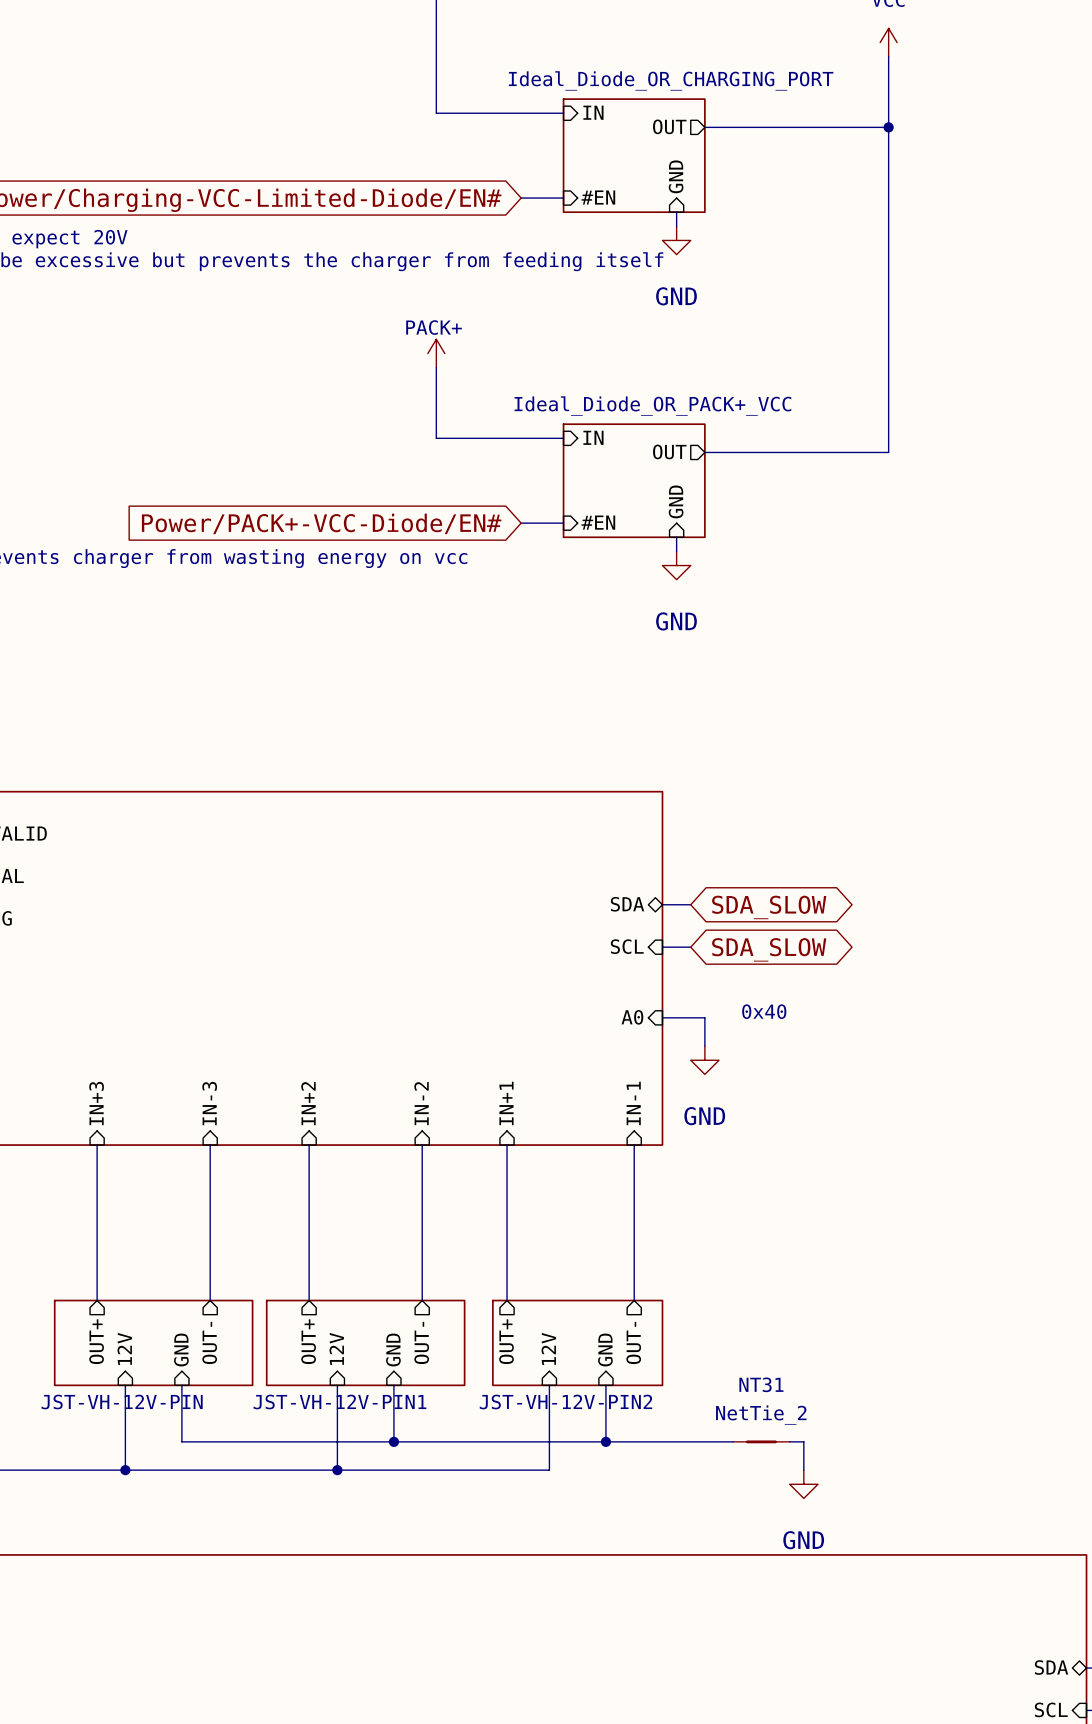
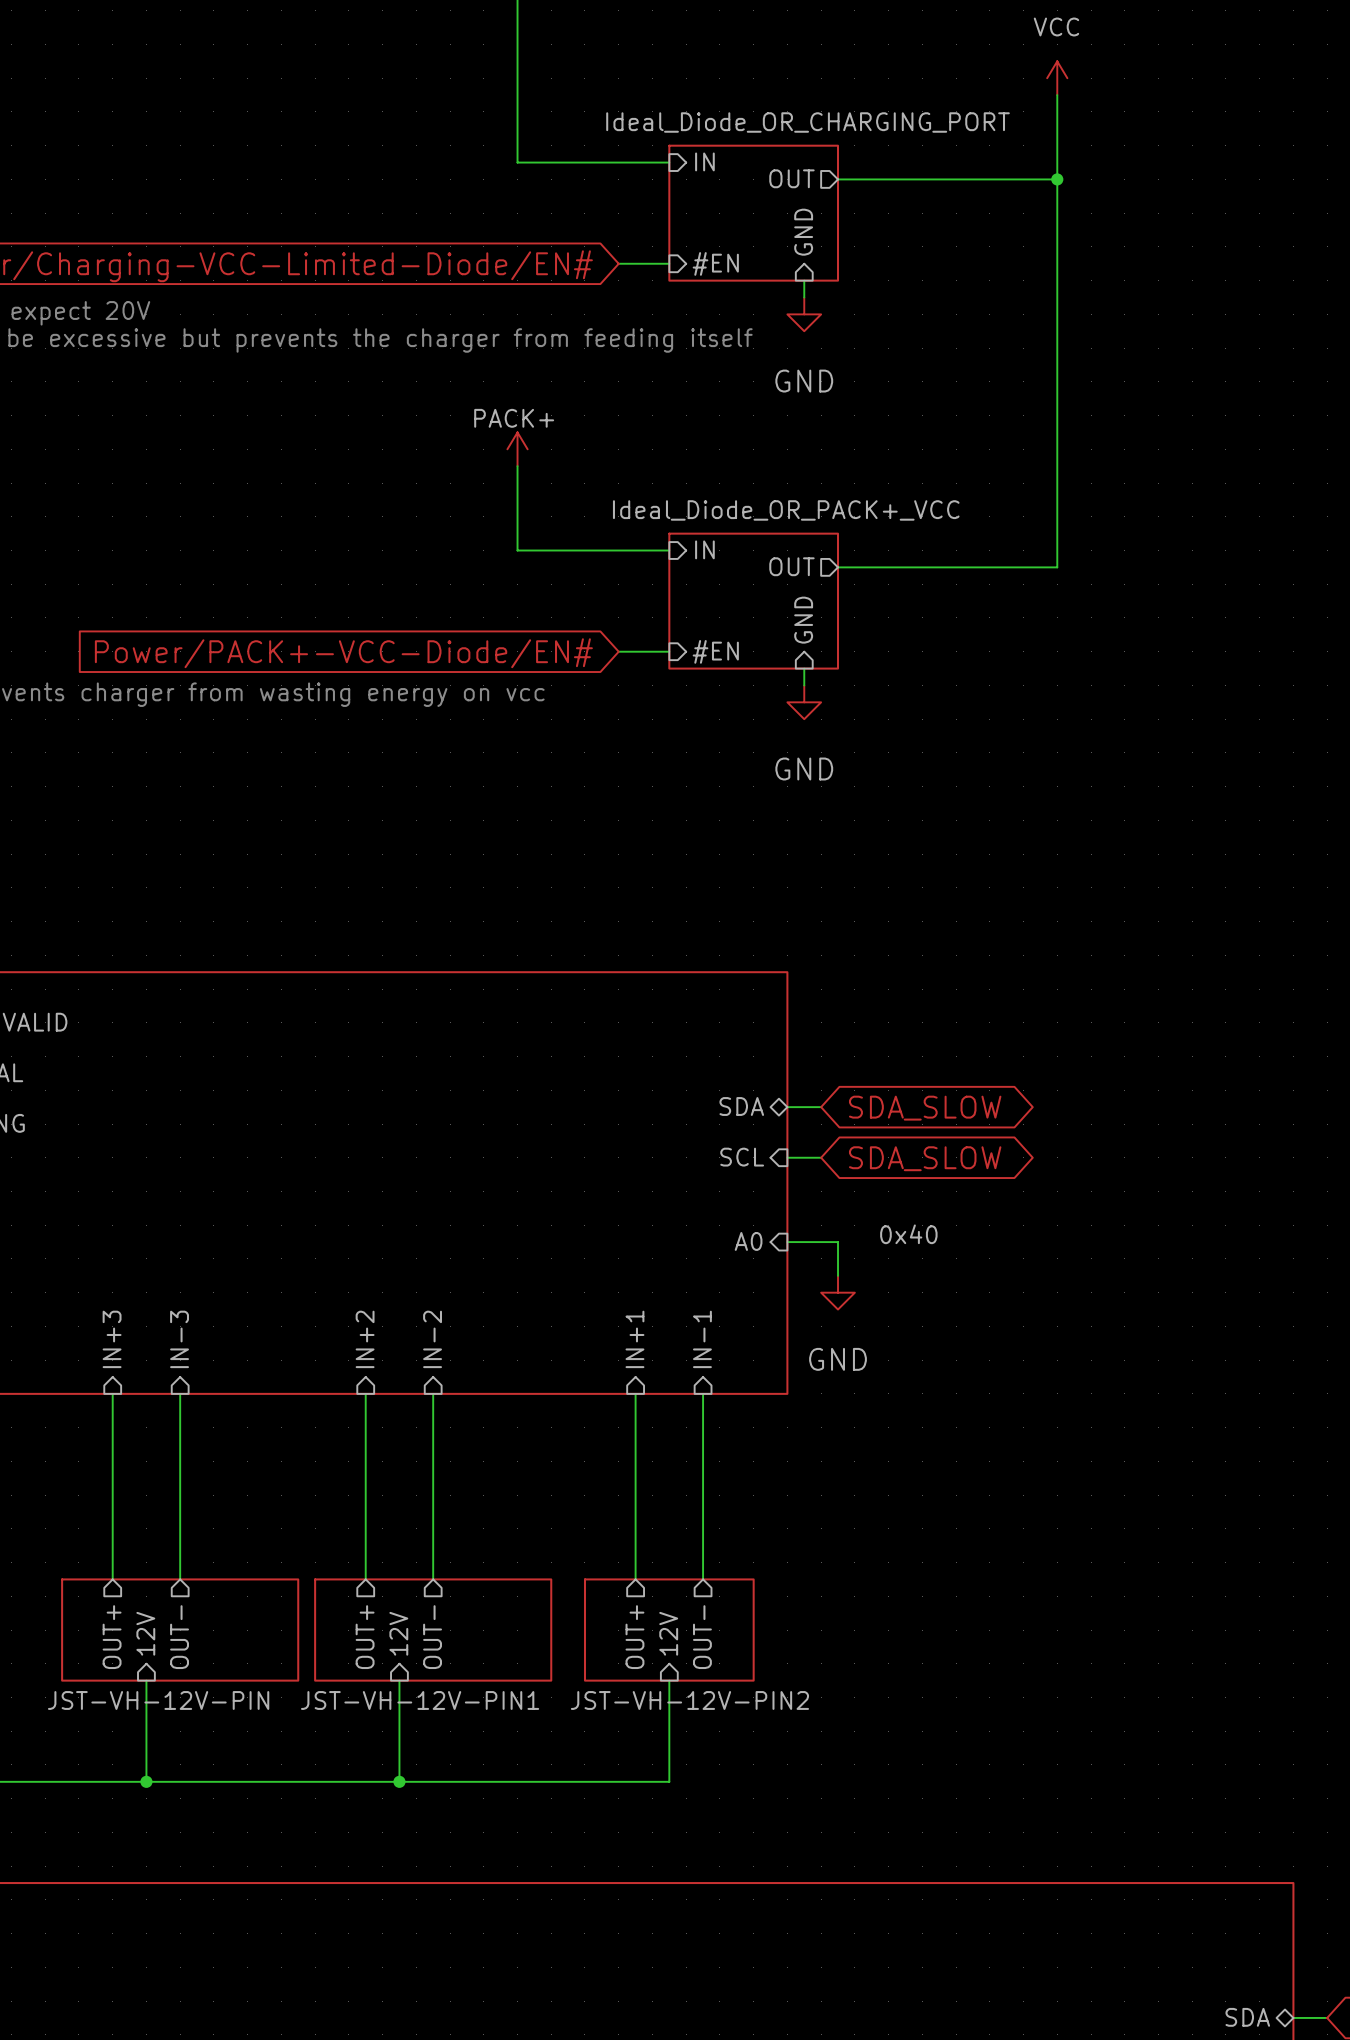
sheet pin position: IN-3 (209, 1103) -> IN-3 (179, 1339)
sheet pin position: IN-2 (421, 1103) -> IN-2 (432, 1339)
sheet pin position: IN+1 (506, 1103) -> IN+1 (634, 1339)
sheet pin position: IN-1 (633, 1103) -> IN-1 (702, 1339)
wire: (210, 1145) (210, 1300) -> (180, 1393) (180, 1579)
wire: (422, 1145) (422, 1300) -> (433, 1393) (433, 1579)
wire: (507, 1145) (507, 1300) -> (635, 1393) (635, 1579)
wire: (634, 1145) (634, 1300) -> (703, 1393) (703, 1579)
sheet JST-VH-12V-PIN2 shape: [492, 1299, 664, 1387] -> [583, 1578, 755, 1682]
sheet pin position: OUT+ (506, 1341) -> OUT+ (634, 1637)
sheet pin position: OUT- (209, 1342) -> OUT- (179, 1637)
sheet pin position: OUT- (421, 1342) -> OUT- (432, 1637)
sheet pin position: OUT- (633, 1342) -> OUT- (702, 1637)
sheet pin position: 12V (548, 1348) -> 12V (668, 1633)
sheet pin: GND (181, 1350) -> none
sheet pin: GND (393, 1350) -> none
sheet pin: GND (605, 1350) -> none
wire: (181, 1385) (181, 1441) (733, 1441) -> none
wire: (393, 1385) (393, 1441) -> none
wire: (549, 1385) (549, 1470) -> (669, 1680) (669, 1781) (652, 1781)
wire: (605, 1385) (605, 1441) -> none
junction: (393, 1441) -> none
junction: (605, 1441) -> none
NT31: NetTie_2 (761, 1441) -> none
wire: (789, 1441) (803, 1441) (803, 1470) -> none
power symbol: GND (803, 1484) -> none

